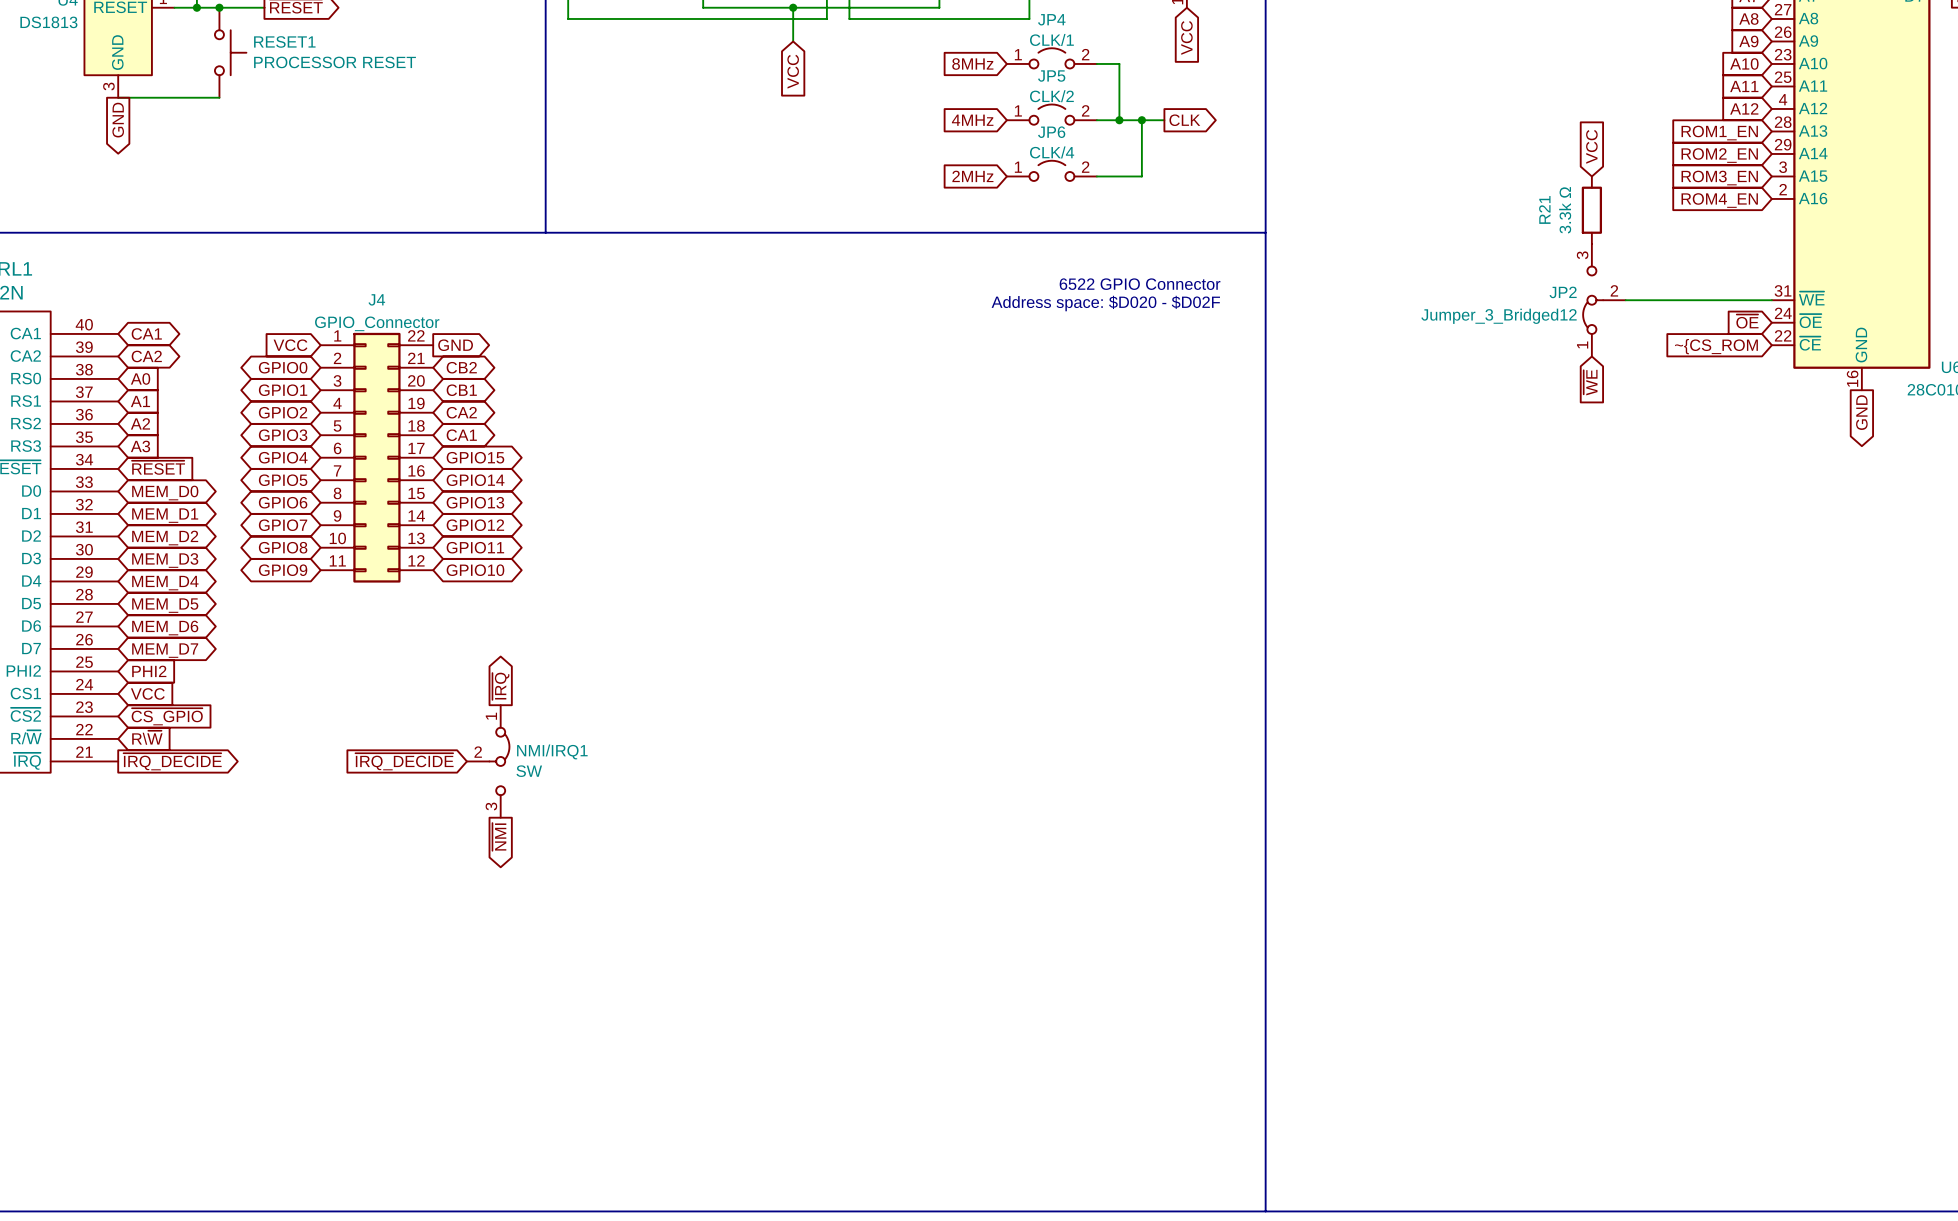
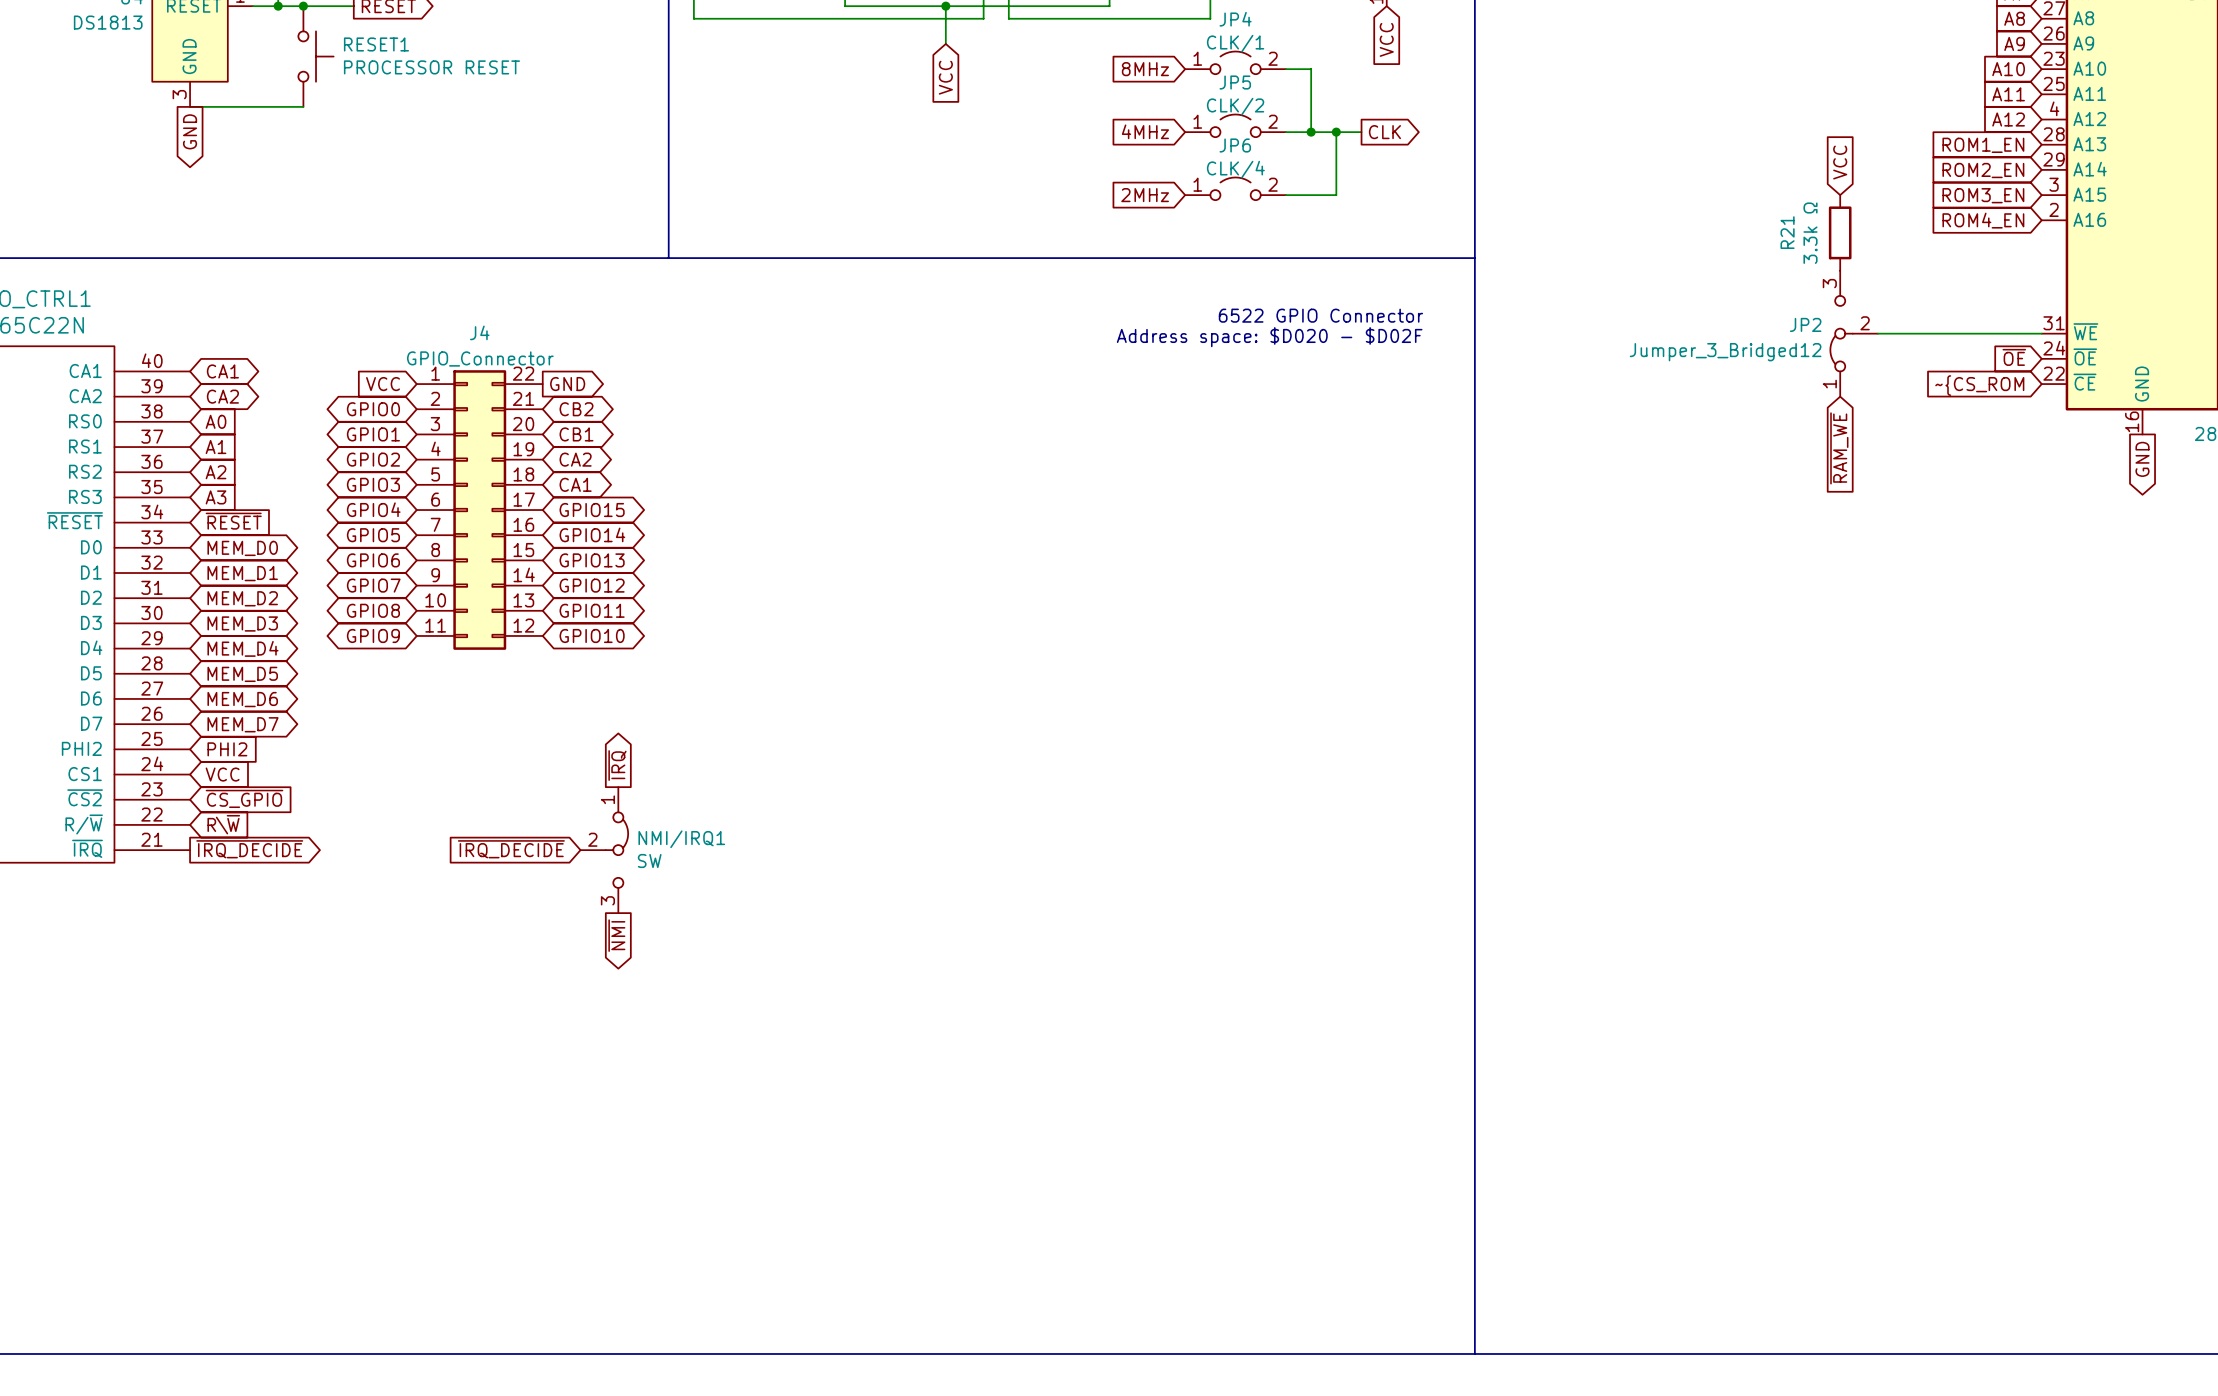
global label: ~{WE} (1590, 382) -> ~{RAM_WE} (1839, 448)

